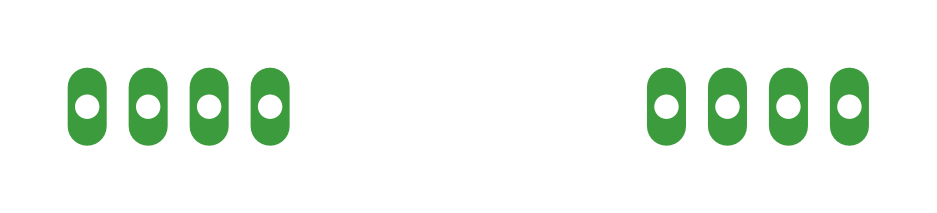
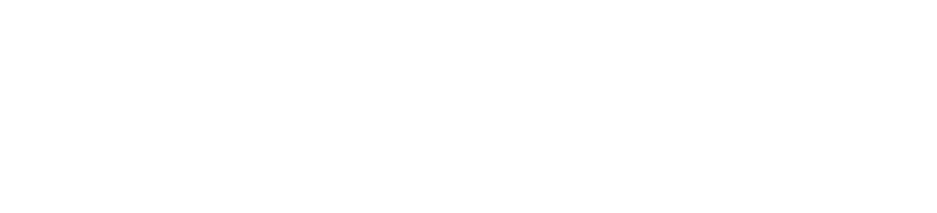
part: (178, 106) -> none
part: (757, 106) -> none

